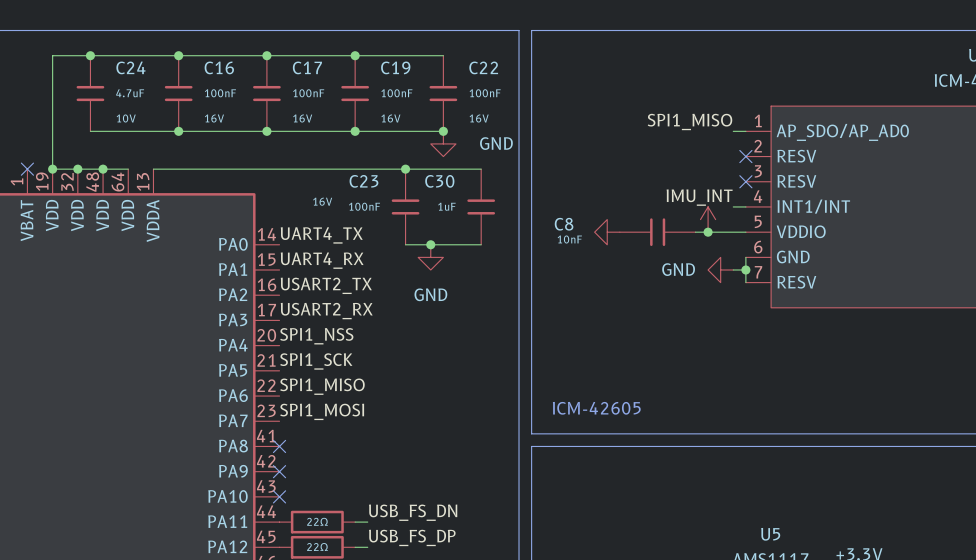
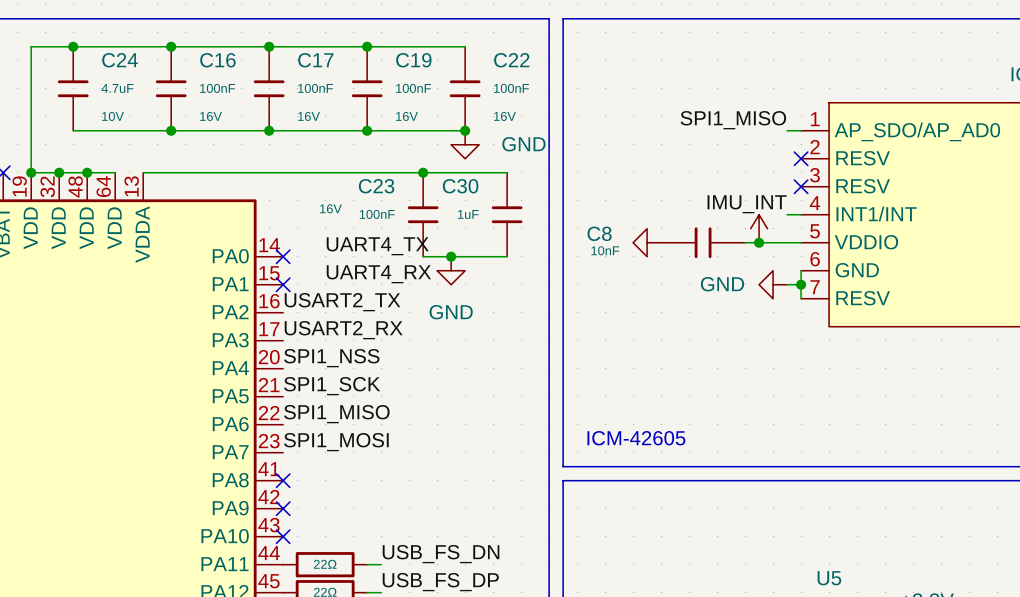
label position: UART4_TX (321, 235) -> UART4_TX (377, 246)
no-connect mark: none -> (283, 256)
label position: UART4_RX (322, 260) -> UART4_RX (378, 274)
no-connect mark: none -> (283, 284)

